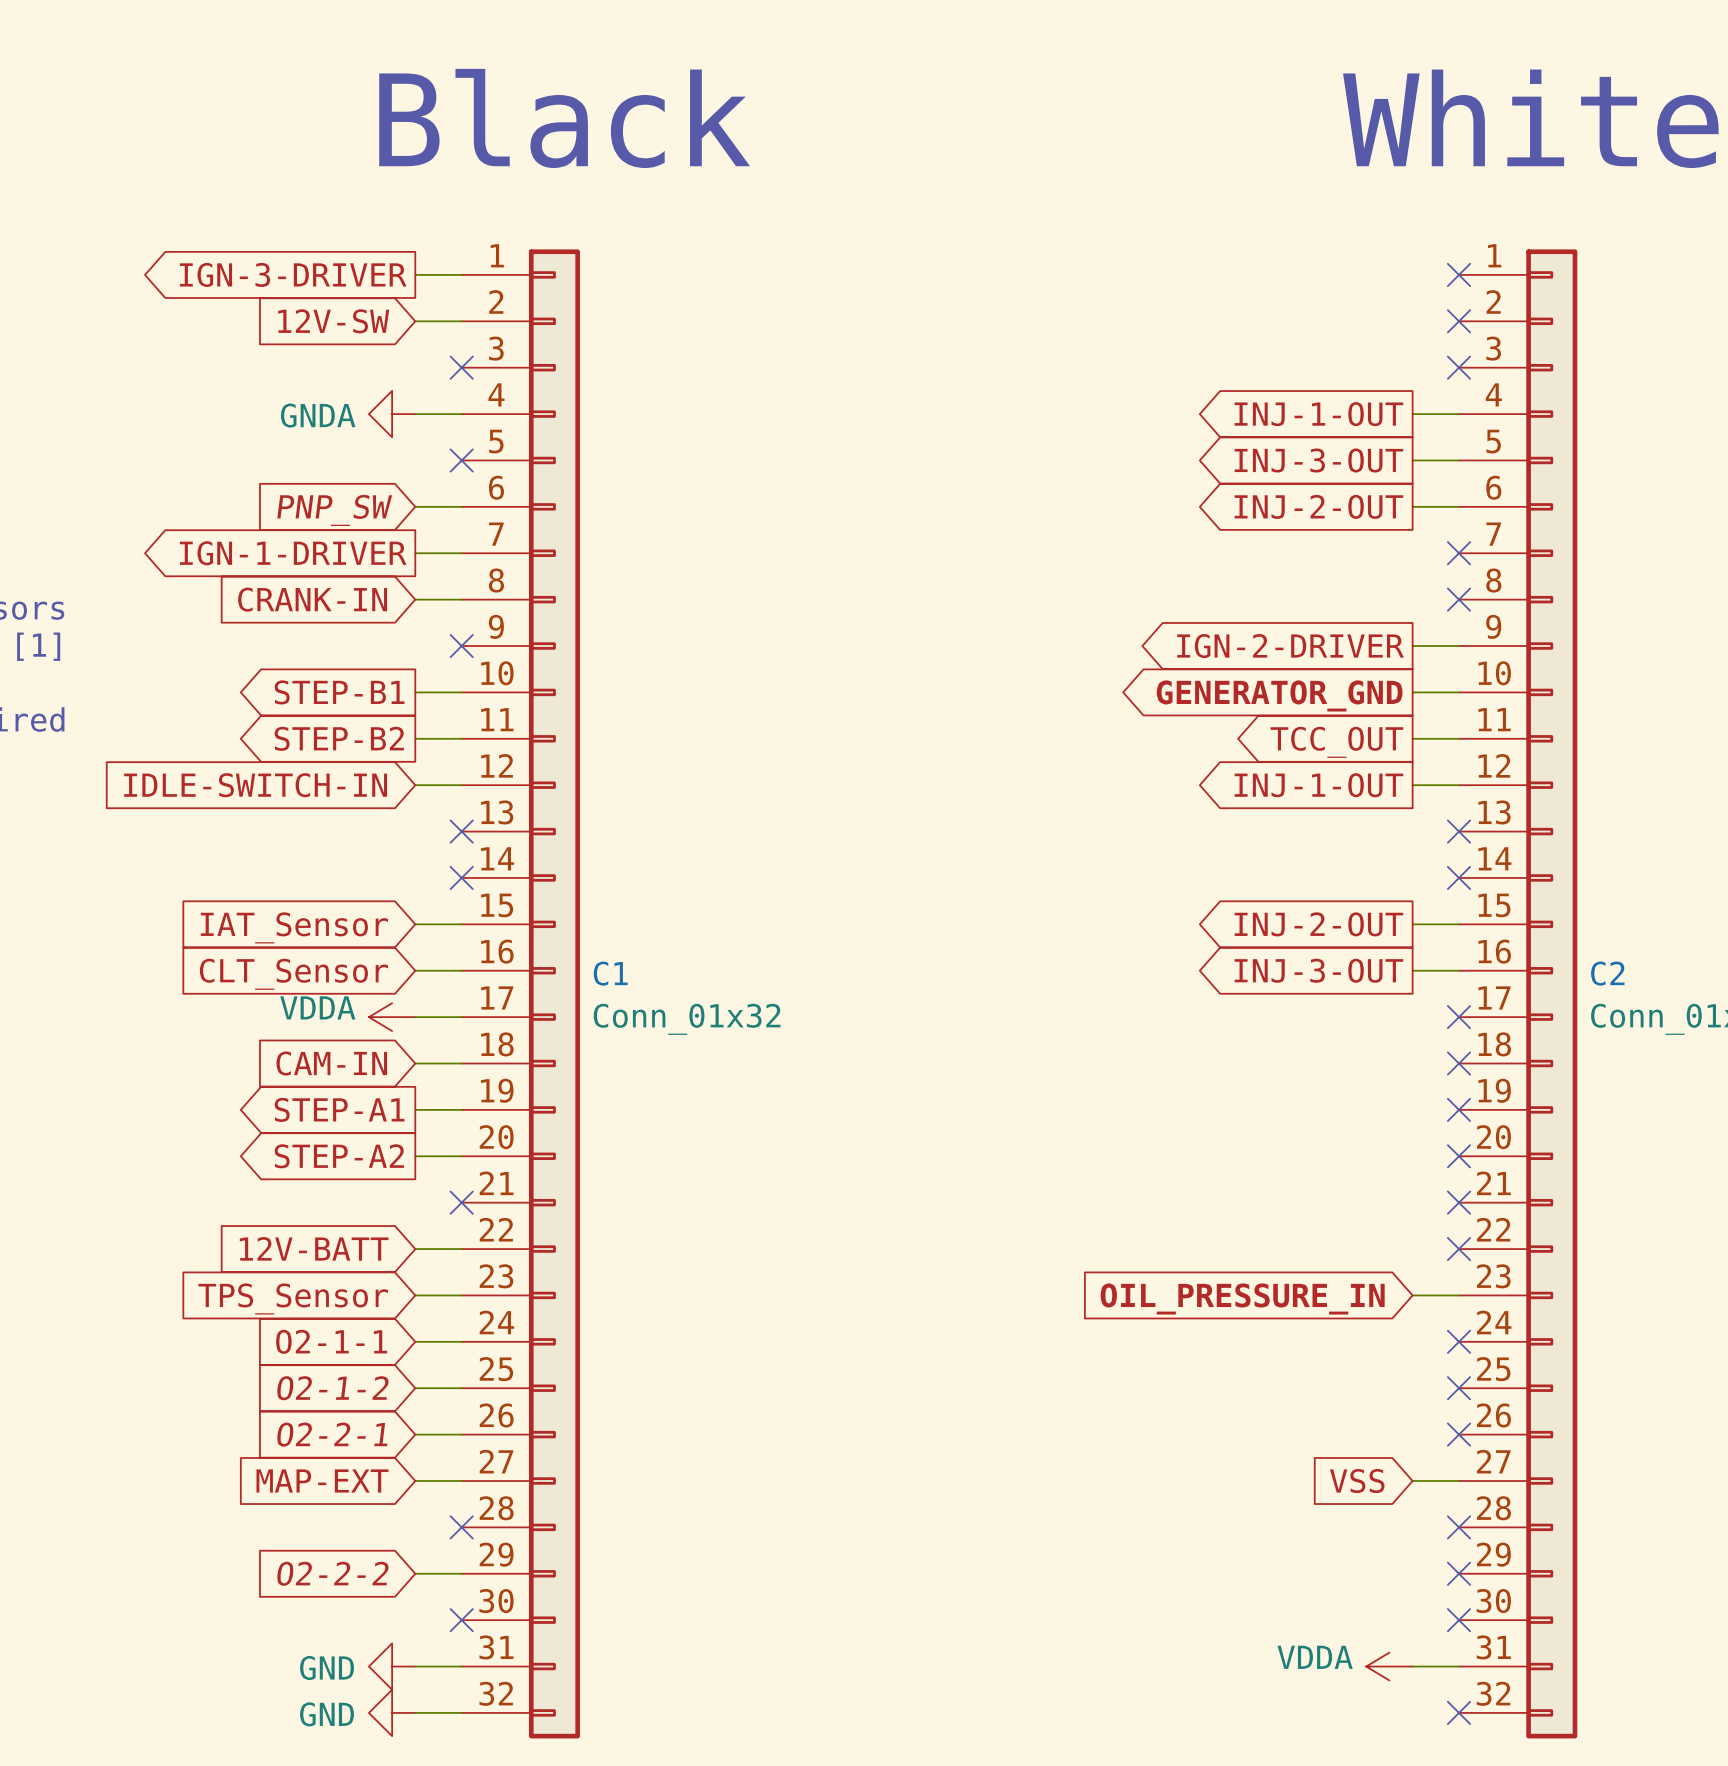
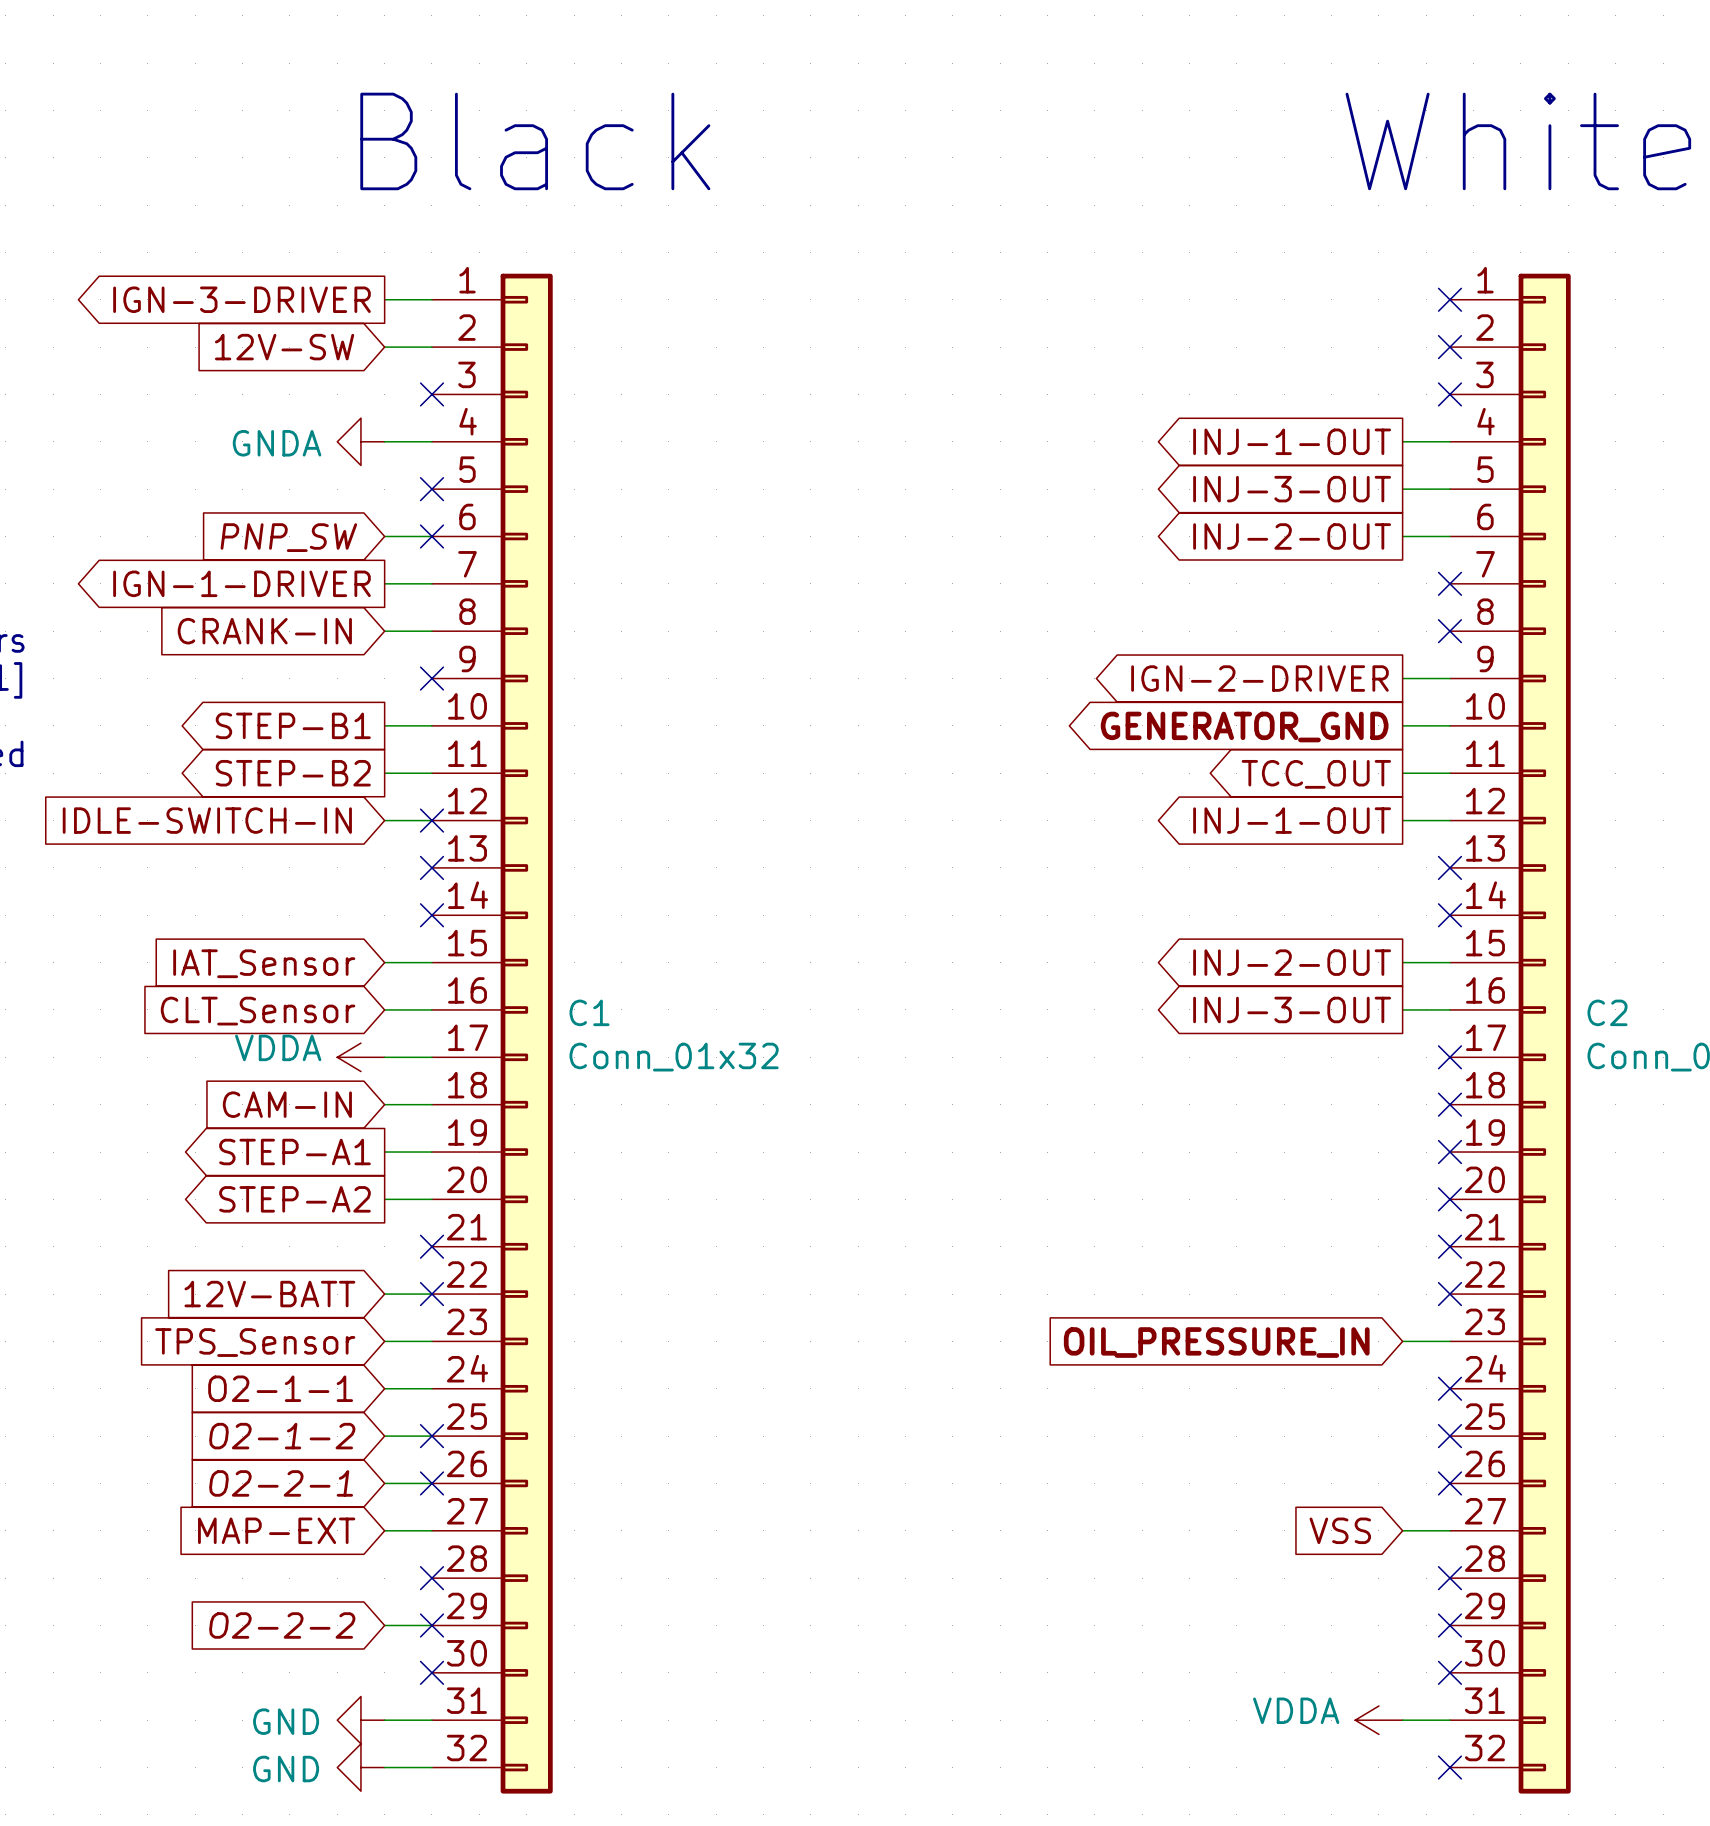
no-connect mark: none -> (431, 536)
no-connect mark: none -> (431, 820)
no-connect mark: none -> (431, 1294)
no-connect mark: none -> (431, 1436)
no-connect mark: none -> (431, 1483)
no-connect mark: none -> (431, 1625)

